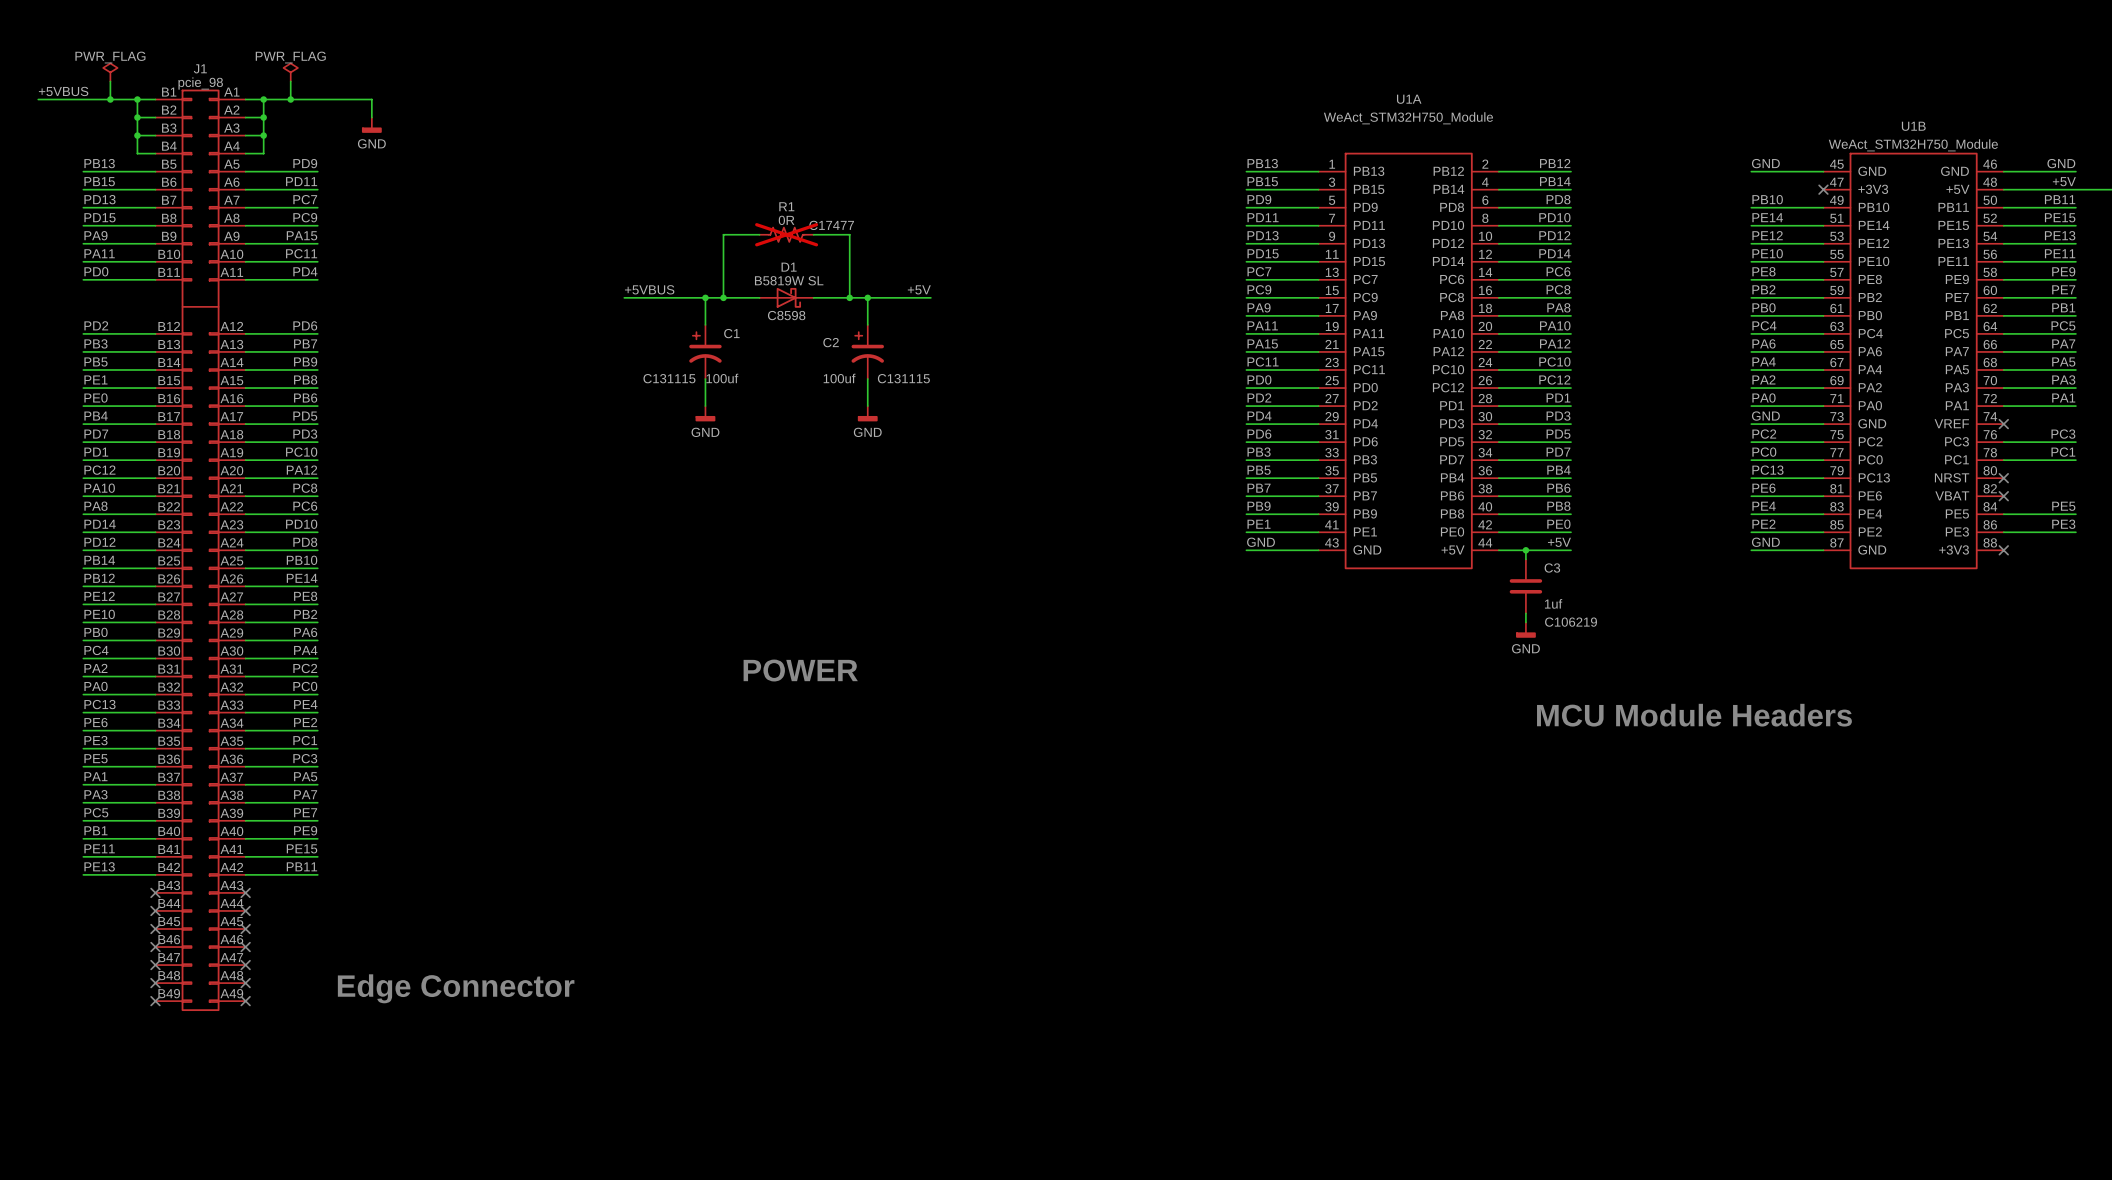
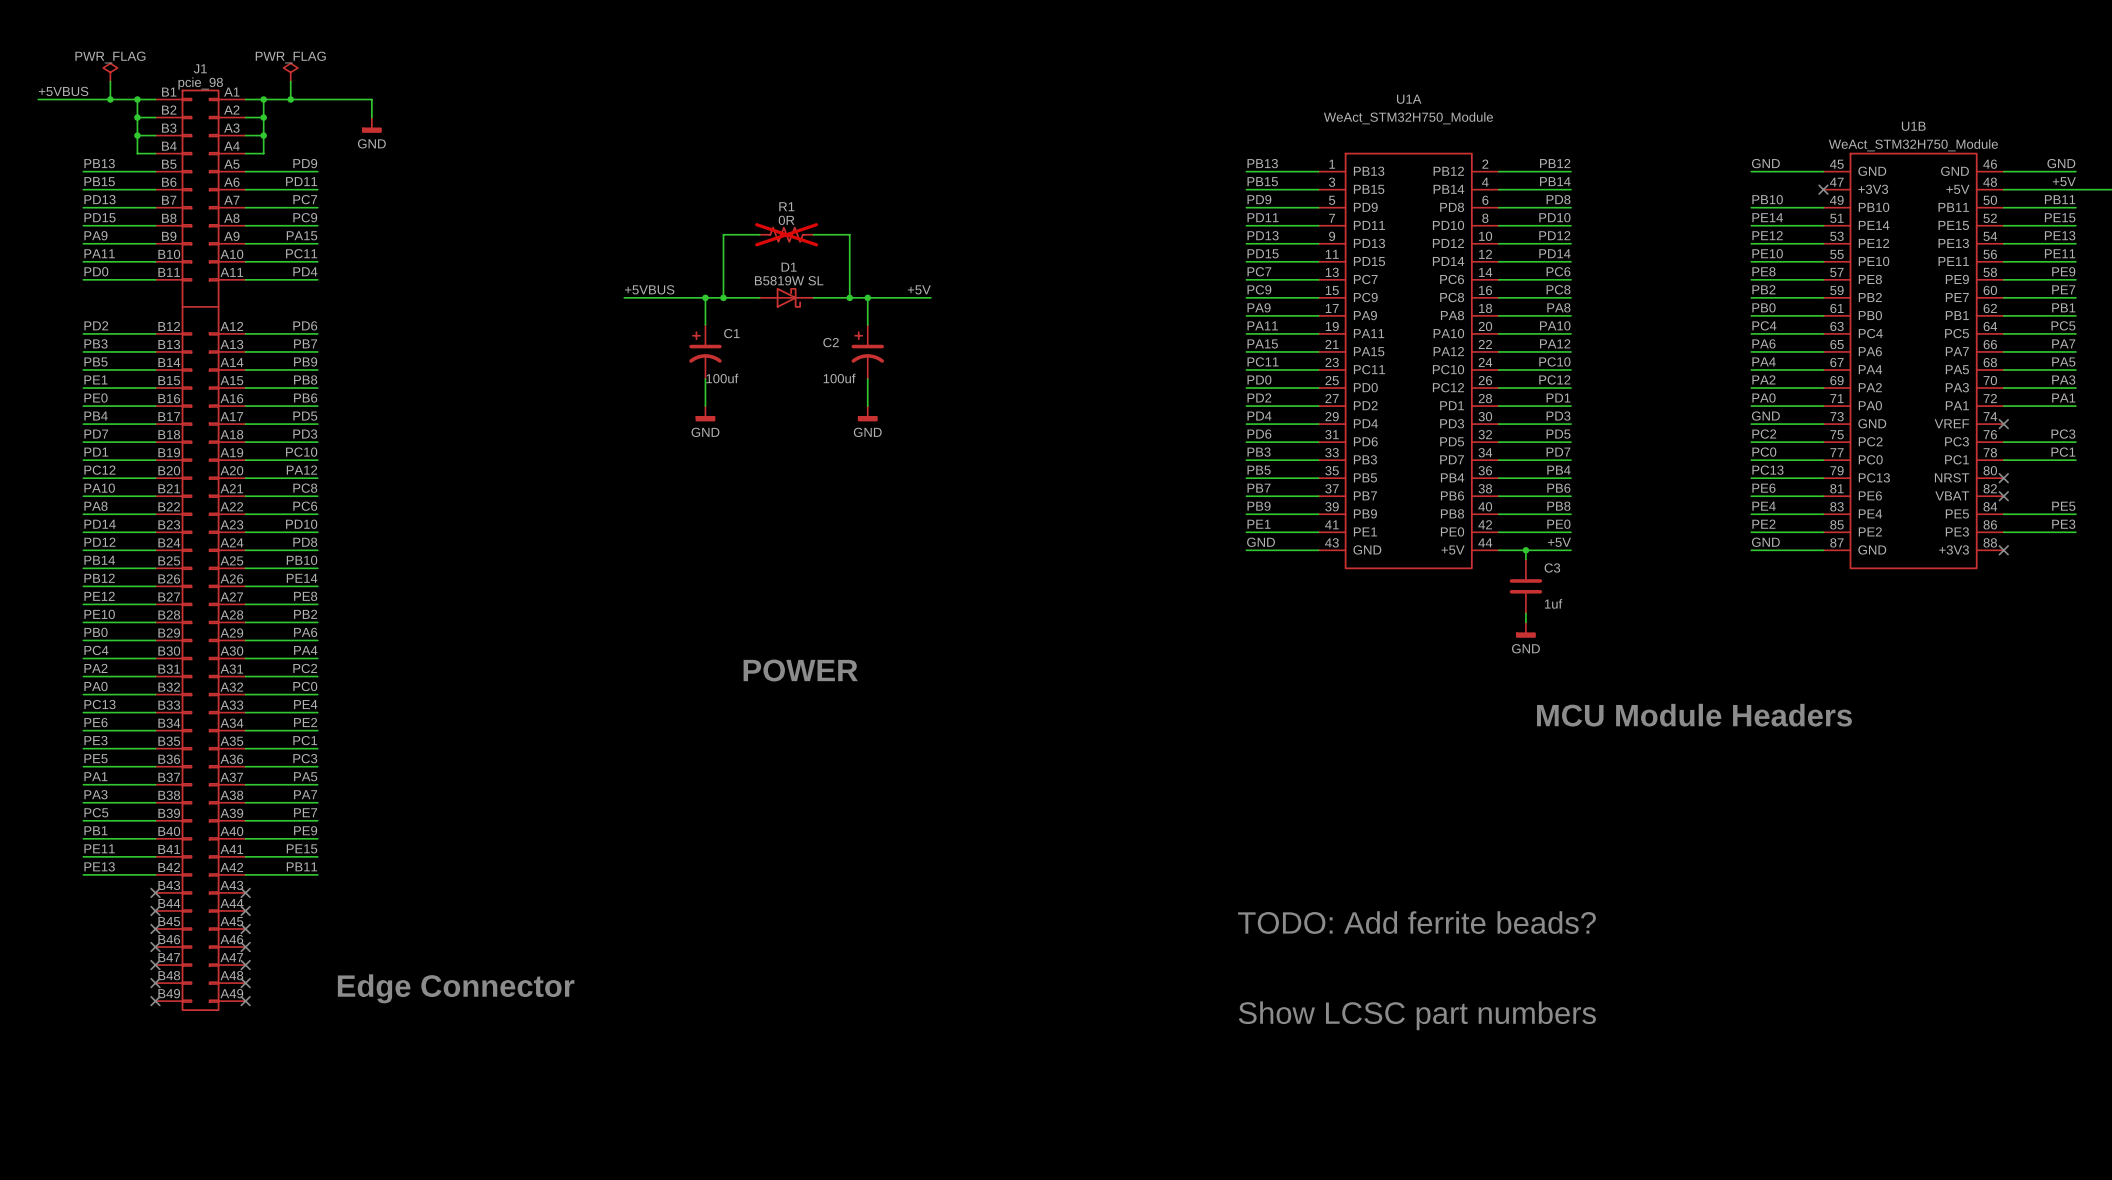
R1 text: C17477 (831, 225) -> none
D1 text: C8598 (786, 315) -> none
C1 text: C131115 (669, 378) -> none
C2 text: C131115 (903, 378) -> none
C3 text: C106219 (1571, 622) -> none
text: none -> TODO: Add ferrite beads? (1416, 922)
text: none -> Show LCSC part numbers (1417, 1015)

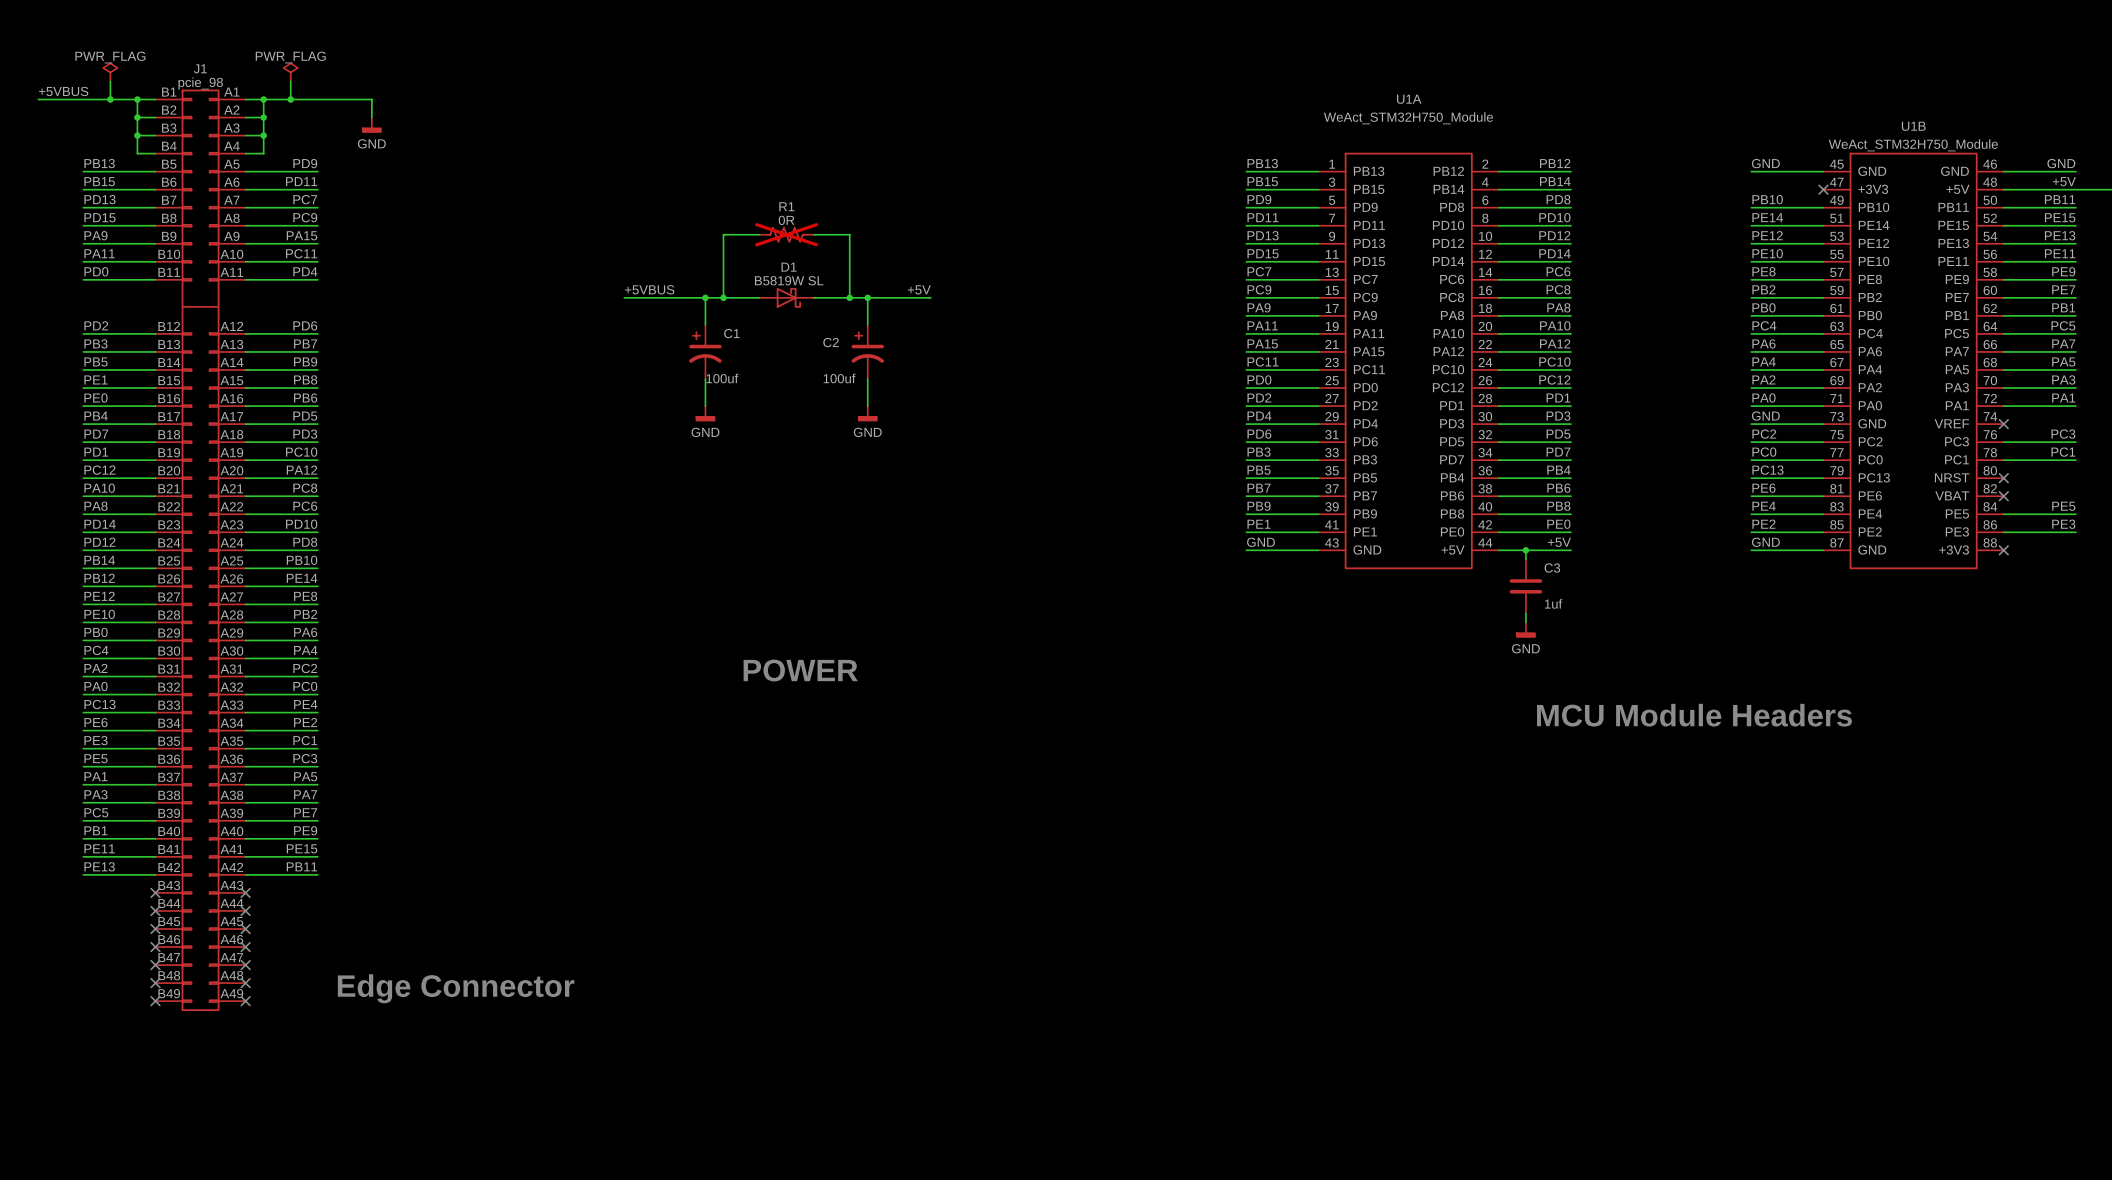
text: TODO: Add ferrite beads? (1416, 922) -> none
text: Show LCSC part numbers (1417, 1015) -> none

